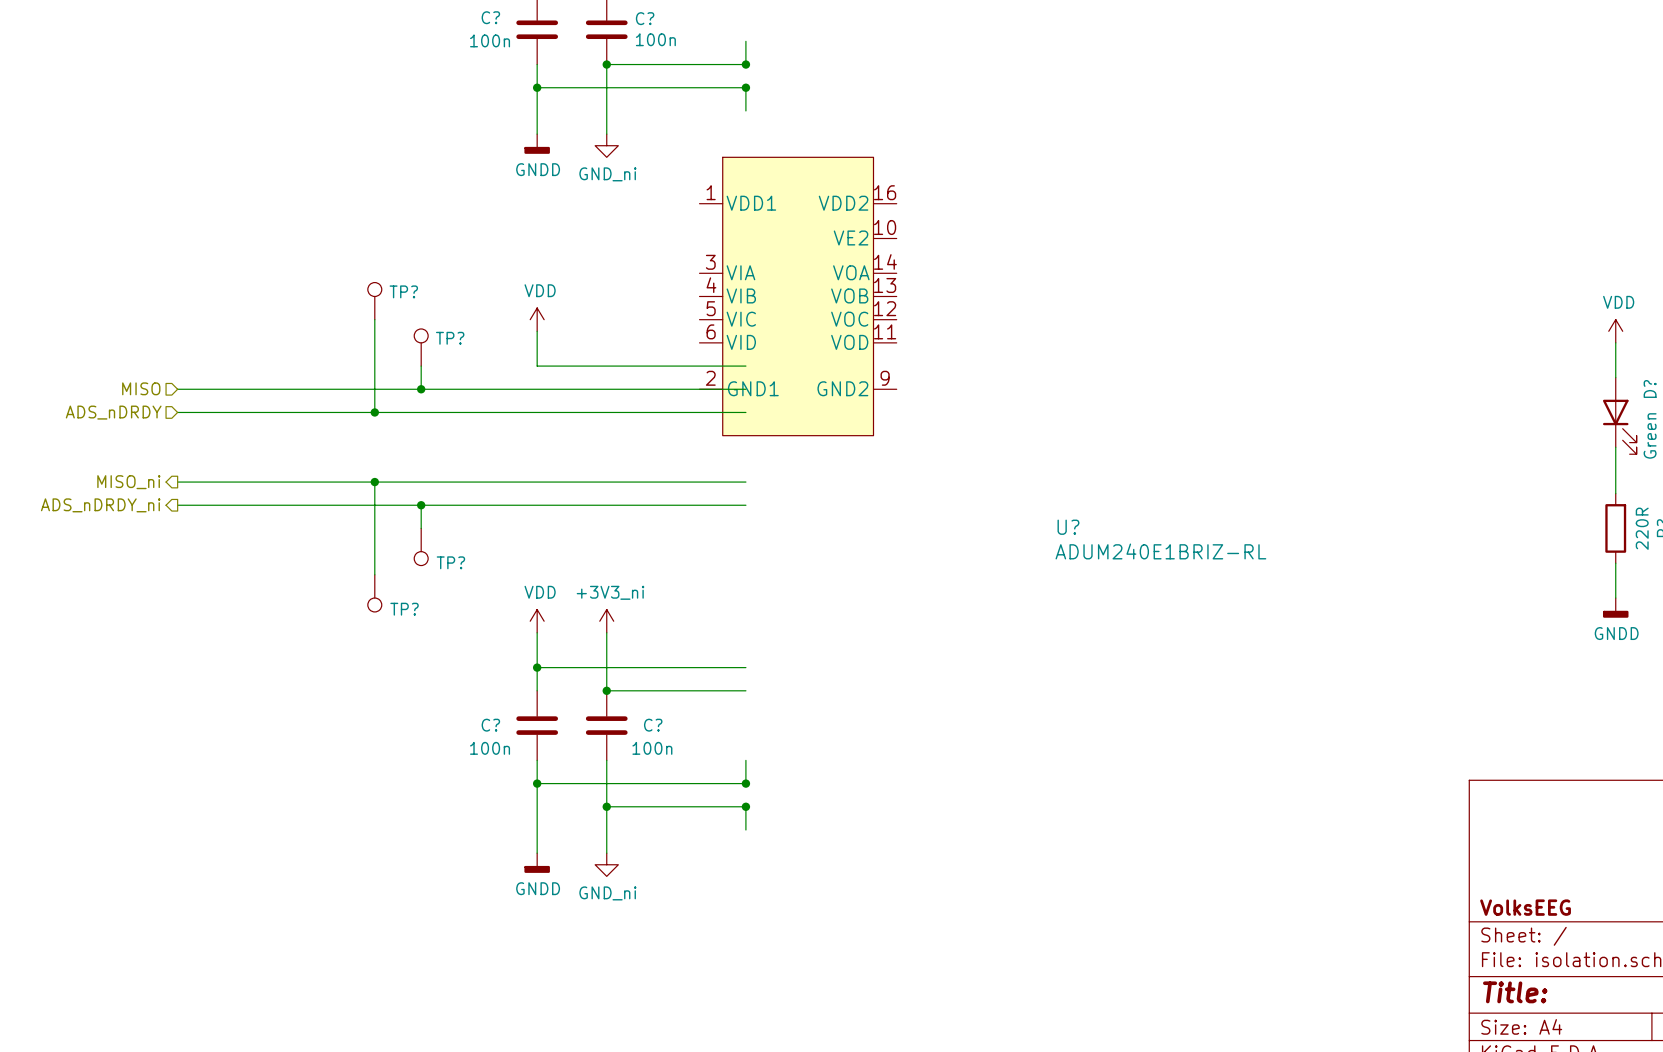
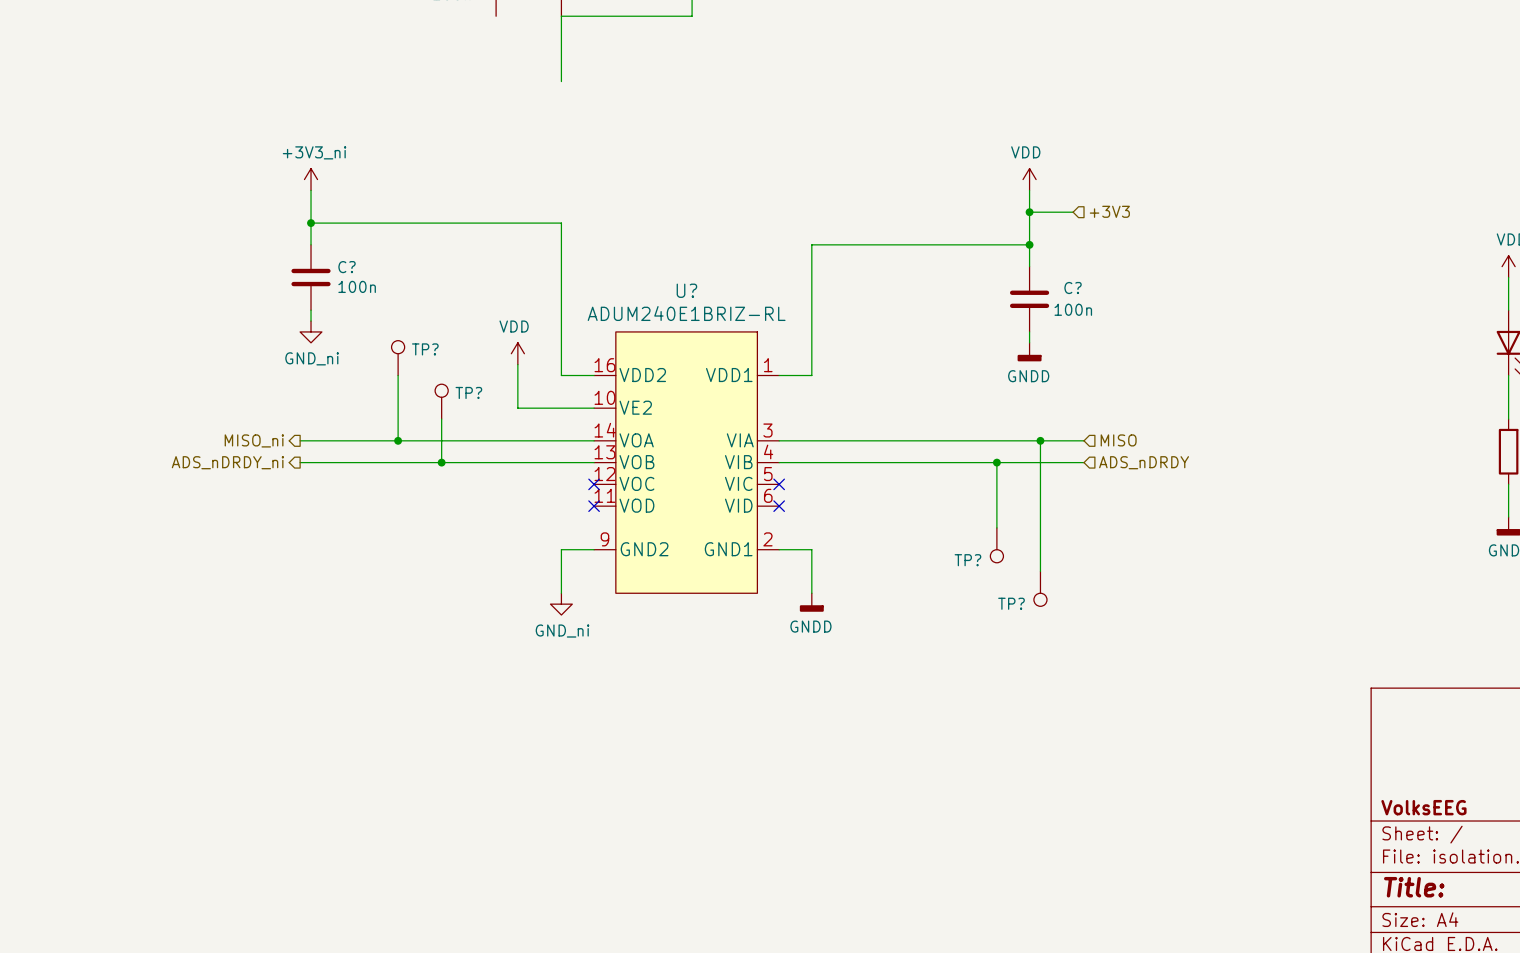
wire: (537, 64) (537, 134) -> none
junction: (606, 64) -> none
junction: (745, 64) -> none
wire: (537, 87) (745, 87) (745, 110) -> none
junction: (537, 87) -> none
junction: (745, 87) -> none
power symbol: GNDD (537, 143) -> none
power symbol: GND_ni (606, 145) -> none
power symbol: none -> +3V3_ni (311, 179)
power symbol: none -> VDD (1029, 179)
wire: none -> (311, 190) (311, 244)
wire: none -> (1029, 190) (1029, 266)
hierarchical label: none -> +3V3 (1109, 211)
wire: none -> (1029, 212) (1073, 212)
junction: none -> (1029, 212)
wire: none -> (311, 223) (561, 223) (561, 375) (594, 375)
junction: none -> (311, 223)
U?: ADUM240E1BRIZ-RL (798, 296) -> none
TP?: (374, 301) -> none
wire: none -> (1029, 244) (811, 244) (811, 375) (779, 375)
junction: none -> (1029, 244)
wire: (374, 319) (374, 412) -> none
power symbol: VDD (537, 319) -> none
wire: (537, 331) (537, 366) (745, 366) -> none
C?: none -> 100n (311, 277)
TP?: (421, 347) -> none
wire: (421, 366) (421, 389) -> none
C?: none -> 100n (1029, 299)
wire: none -> (311, 310) (311, 321)
hierarchical label: MISO (141, 388) -> none
wire: (177, 389) (745, 389) -> none
junction: (421, 389) -> none
power symbol: none -> GND_ni (311, 331)
wire: none -> (1029, 331) (1029, 342)
hierarchical label: ADS_nDRDY (113, 412) -> none
wire: (177, 412) (745, 412) -> none
junction: (374, 412) -> none
power symbol: none -> GNDD (1029, 352)
power symbol: none -> VDD (517, 353)
TP?: none -> (398, 358)
wire: none -> (398, 375) (398, 440)
TP?: none -> (441, 401)
hierarchical label position: MISO_ni (128, 482) -> MISO_ni (254, 440)
wire: (177, 482) (560, 482) -> (517, 364) (517, 408)
wire: (374, 482) (374, 574) -> none
junction: (374, 482) -> none
wire: none -> (441, 419) (441, 462)
hierarchical label position: ADS_nDRDY_ni (100, 505) -> ADS_nDRDY_ni (227, 462)
wire: (177, 505) (745, 505) -> none
wire: (421, 505) (421, 528) -> none
junction position: (421, 505) -> (398, 440)
wire: none -> (300, 440) (594, 440)
wire: none -> (779, 440) (1084, 440)
wire: none -> (1040, 440) (1040, 571)
junction: none -> (1040, 440)
hierarchical label: none -> MISO (1118, 440)
wire: none -> (300, 462) (594, 462)
junction: none -> (441, 462)
U?: none -> ADUM240E1BRIZ-RL (686, 462)
wire: none -> (779, 462) (1084, 462)
wire: none -> (996, 462) (996, 527)
junction: none -> (996, 462)
hierarchical label: none -> ADS_nDRDY (1144, 462)
TP?: (421, 546) -> none
no-connect mark: none -> (594, 484)
no-connect mark: none -> (779, 484)
no-connect mark: none -> (594, 506)
no-connect mark: none -> (779, 506)
TP?: (374, 593) -> none
power symbol: VDD (537, 621) -> none
power symbol: +3V3_ni (606, 621) -> none
TP?: none -> (996, 545)
wire: (537, 632) (537, 690) -> none
wire: none -> (561, 549) (594, 549)
wire: none -> (779, 549) (811, 549) (811, 593)
wire: (537, 667) (745, 667) -> none
junction: (537, 667) -> none
TP?: none -> (1040, 588)
wire: (606, 679) (606, 690) (745, 690) -> none
power symbol: none -> GNDD (811, 602)
junction: (606, 690) -> none
C?: 100n (537, 725) -> none
C?: 100n (606, 725) -> none
wire: (537, 760) (537, 853) -> none
wire: (606, 760) (606, 853) -> none
wire: (745, 760) (745, 783) (537, 783) -> none
junction: (537, 783) -> none
junction: (745, 783) -> none
wire: (606, 806) (745, 806) (745, 829) -> none
junction: (606, 806) -> none
junction: (745, 806) -> none
power symbol: GNDD (537, 863) -> none
power symbol position: GND_ni (606, 864) -> GND_ni (561, 604)

